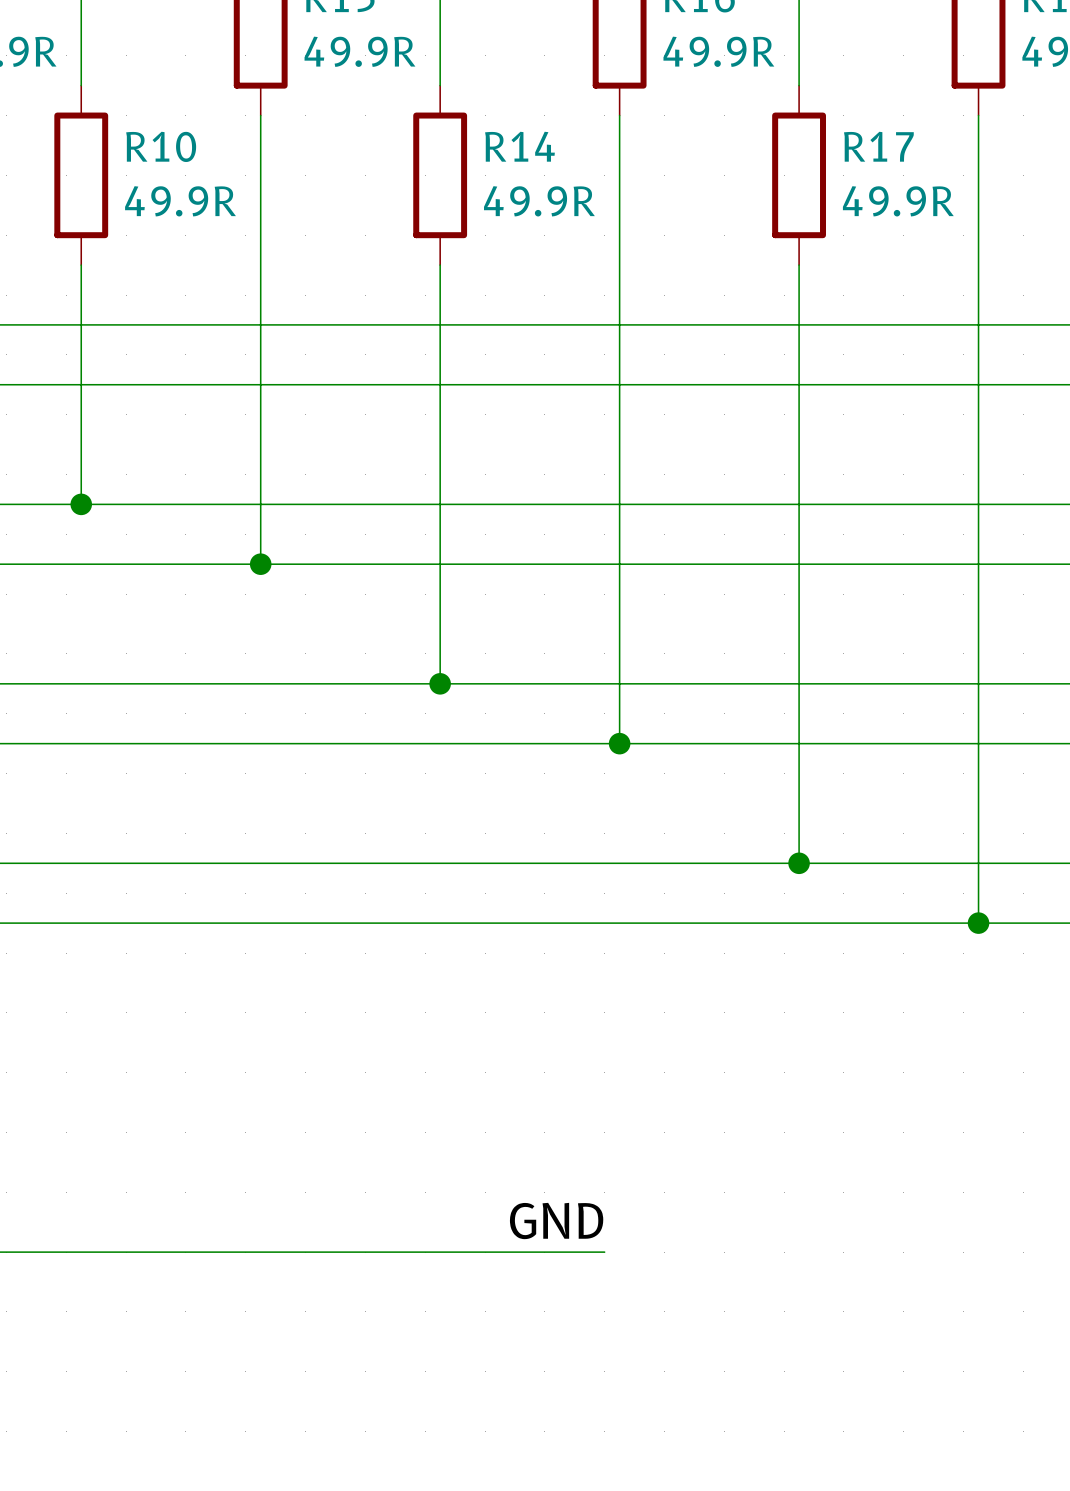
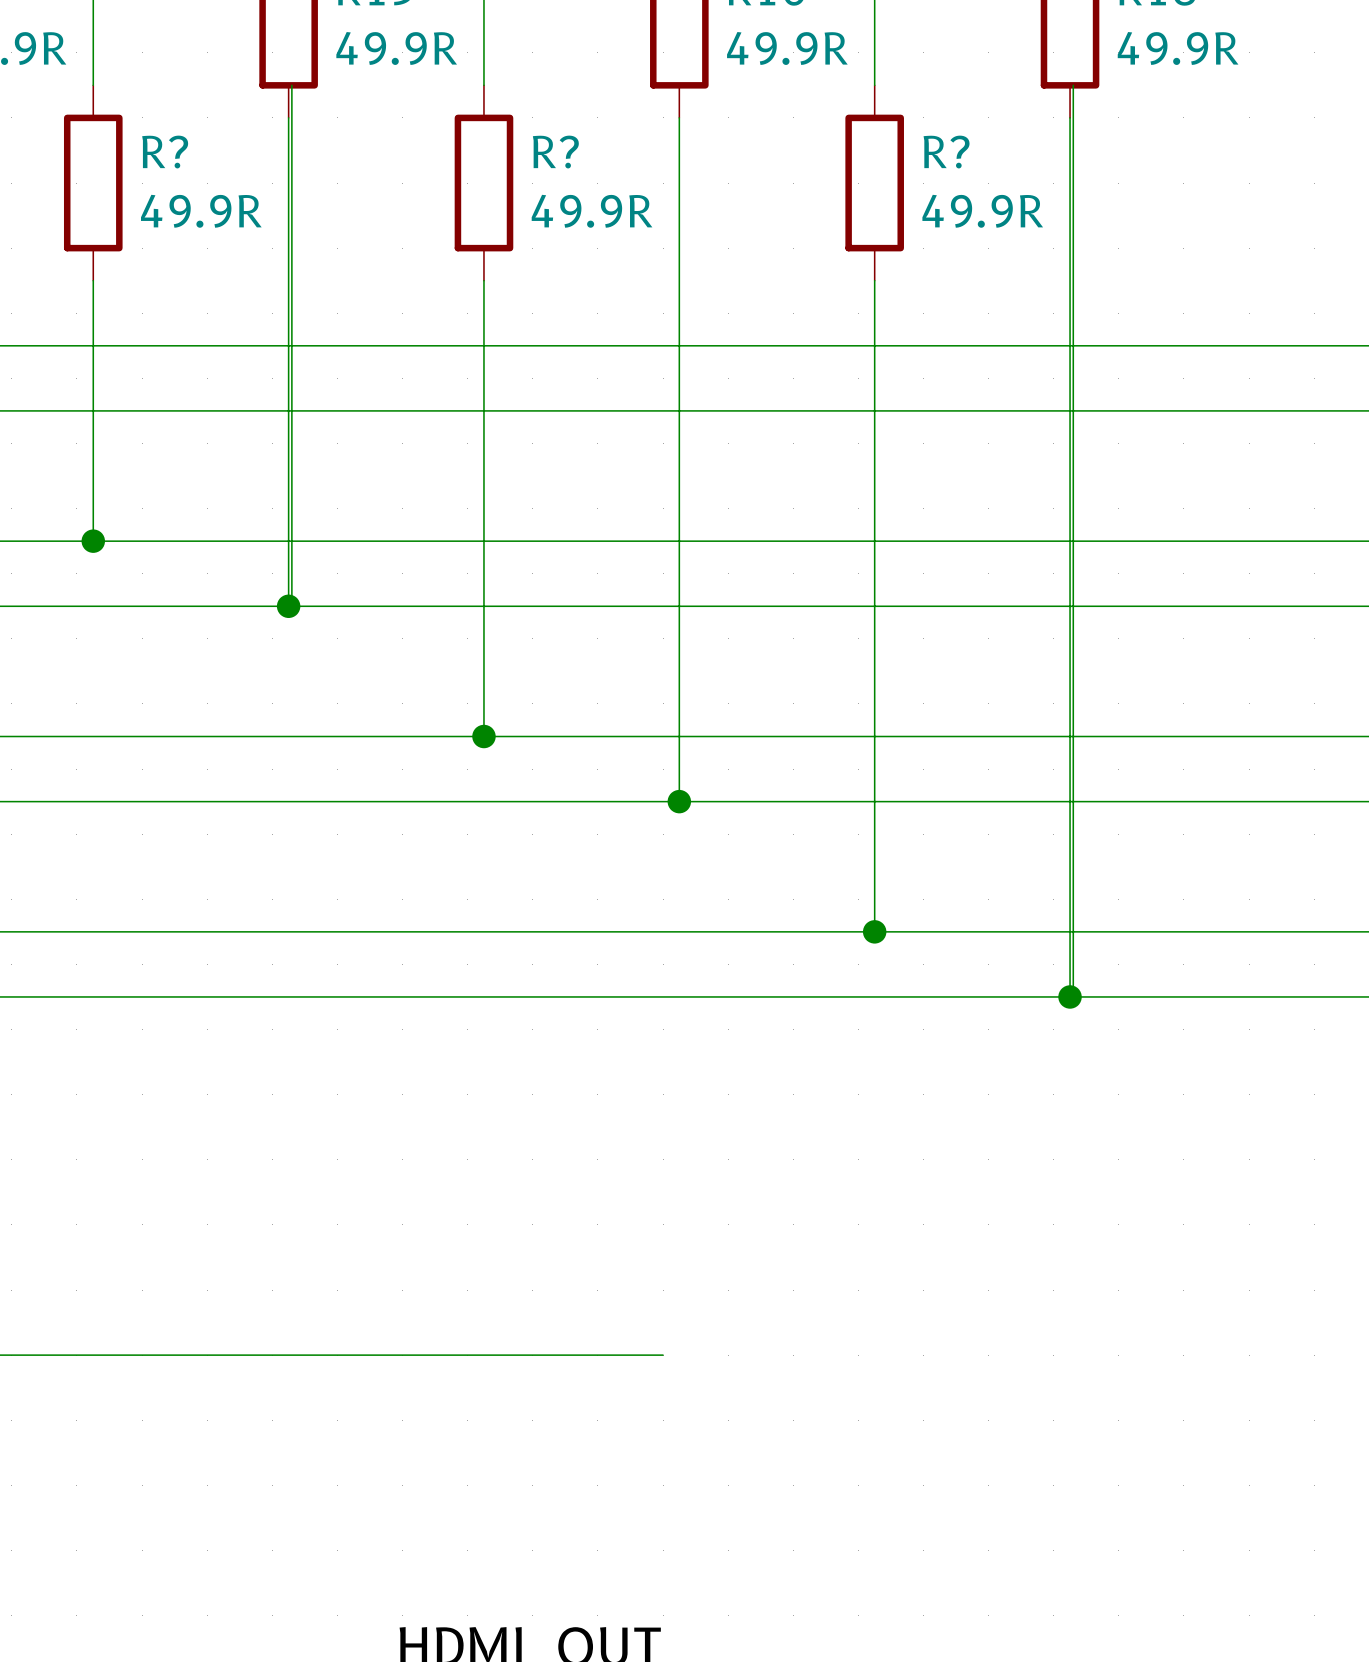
wire: none -> (291, 85) (291, 606)
wire: none -> (1073, 85) (1073, 996)
R10 name: R10 (161, 146) -> R? (165, 152)
R14 name: R14 (519, 146) -> R? (555, 152)
R17 name: R17 (878, 146) -> R? (946, 152)
label: GND (556, 1221) -> none

